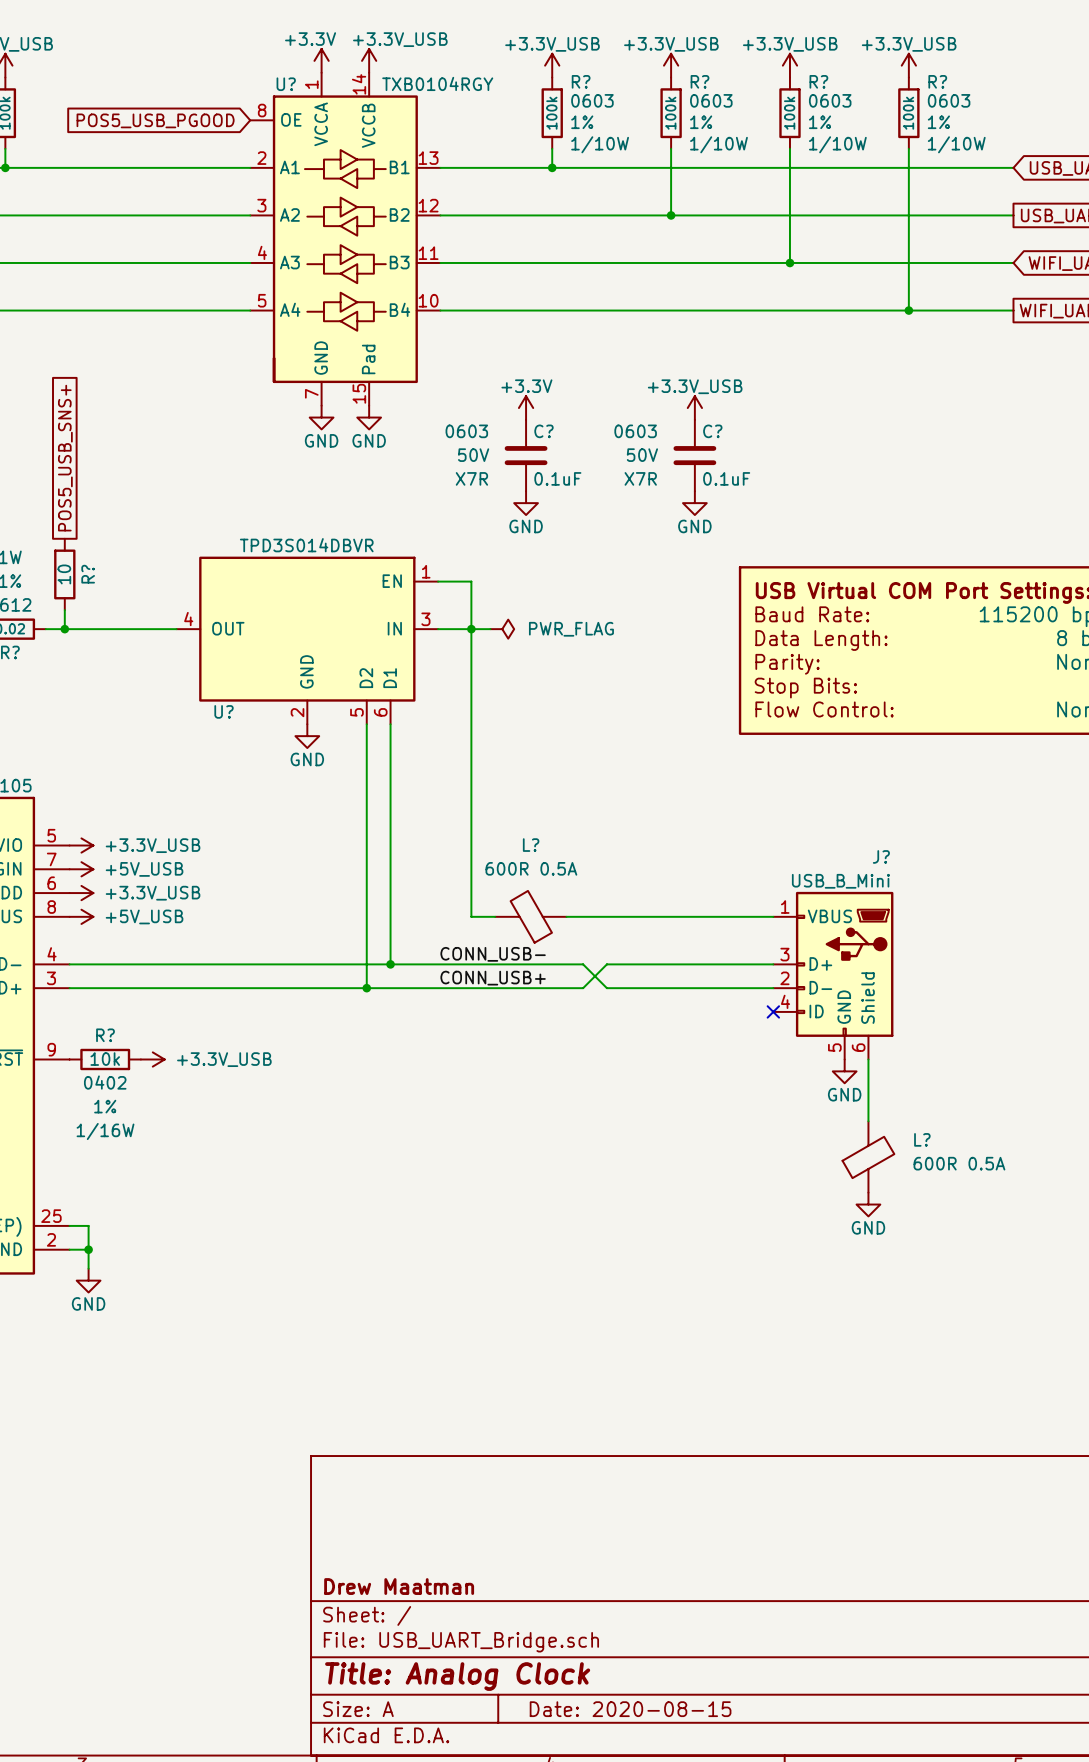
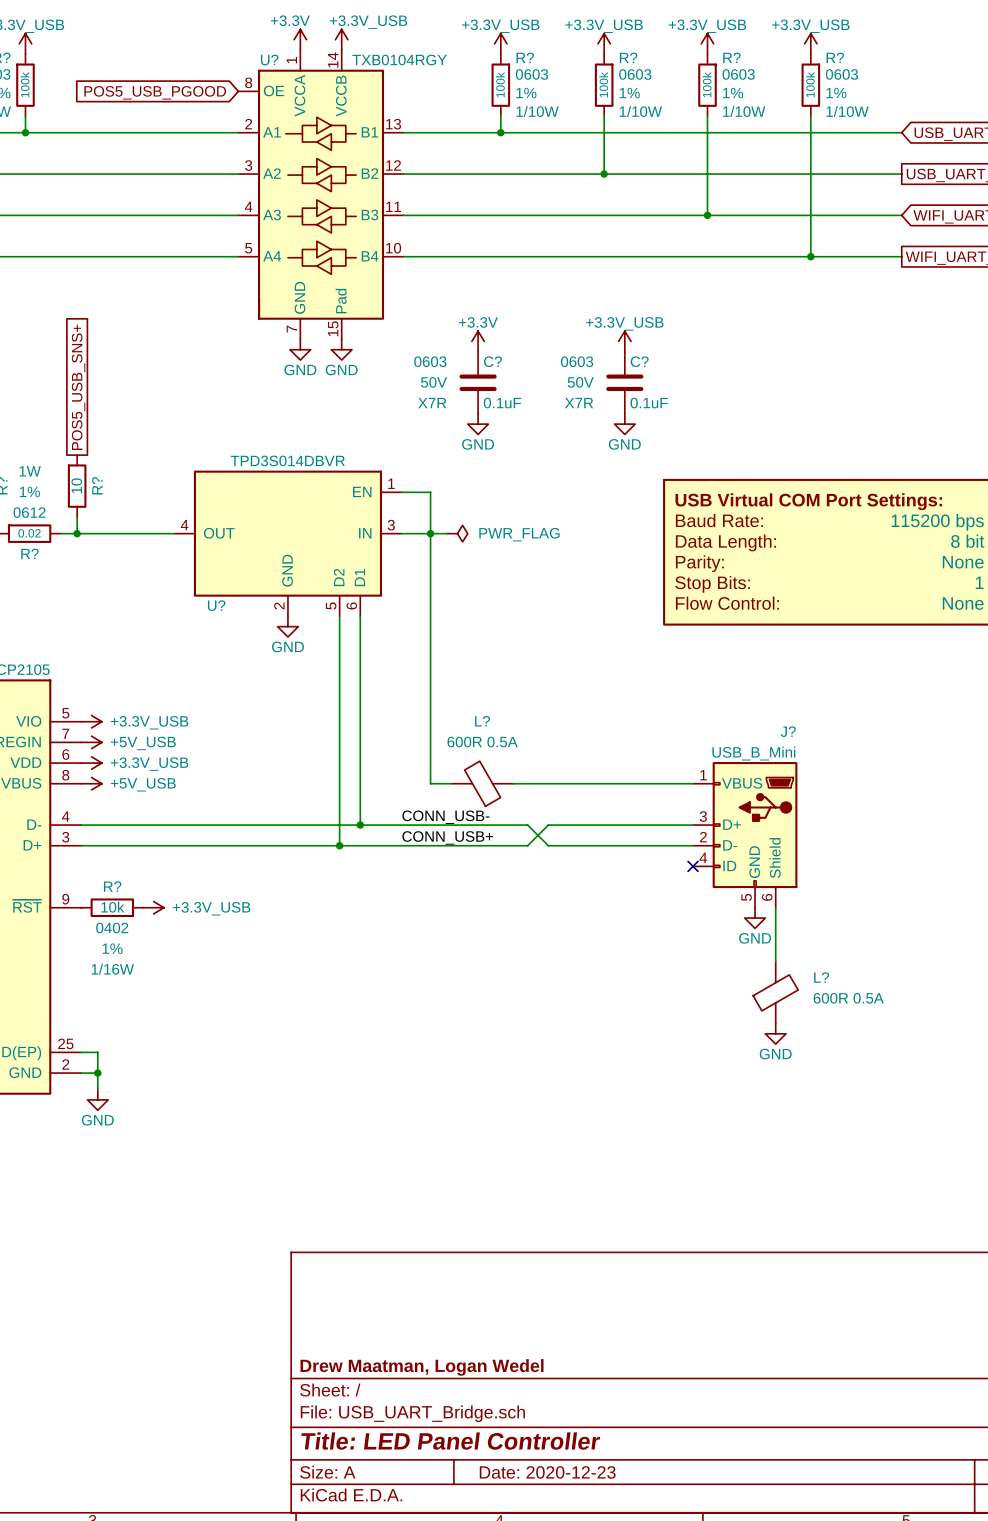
title block: Drew Maatman (399, 1586) -> Drew Maatman, Logan Wedel (422, 1367)
title block: Title: Analog Clock (457, 1676) -> Title: LED Panel Controller (450, 1441)
title block: Date: 2020-08-15 (630, 1709) -> Date: 2020-12-23 (547, 1472)

